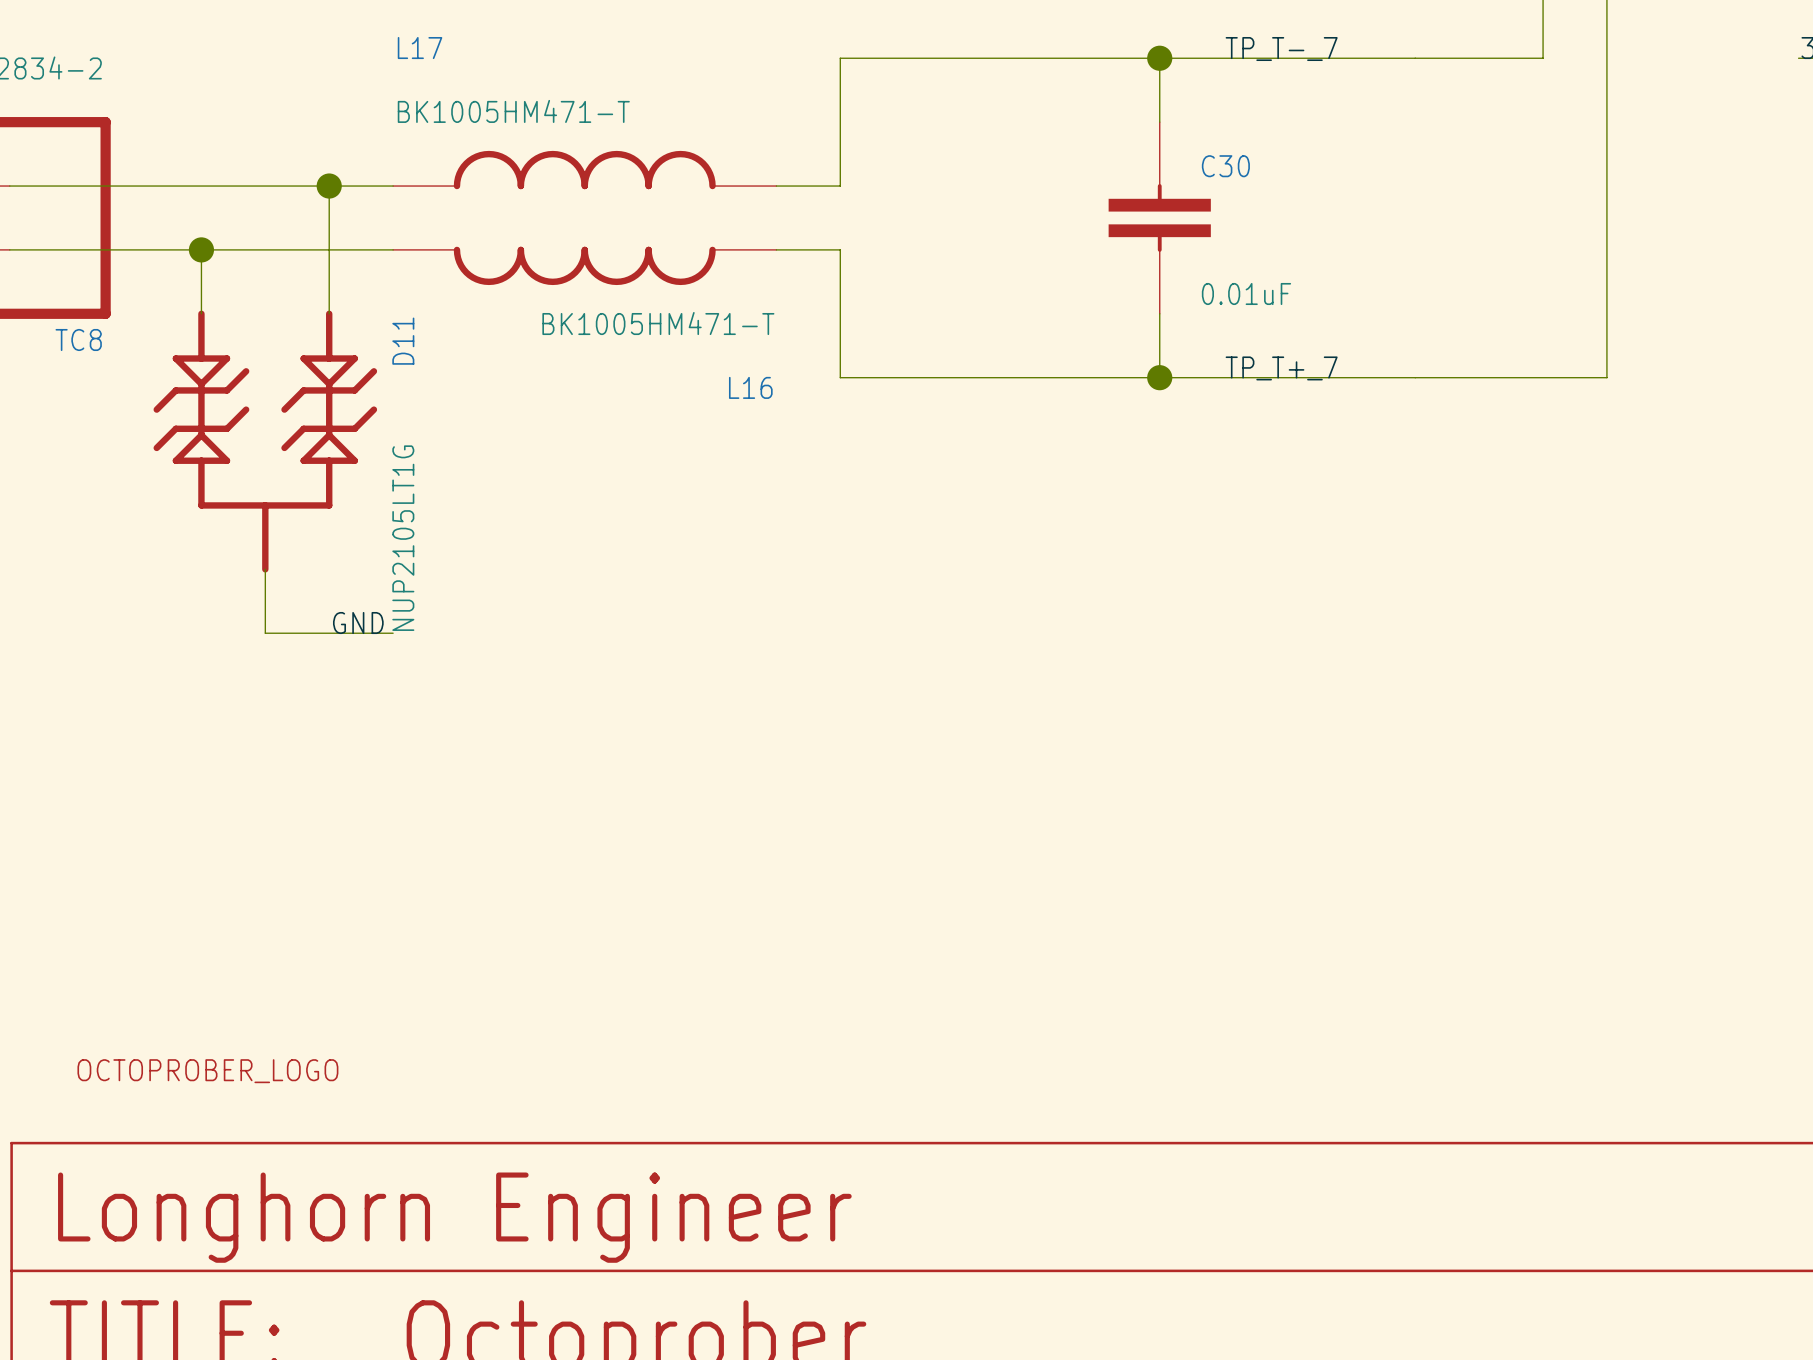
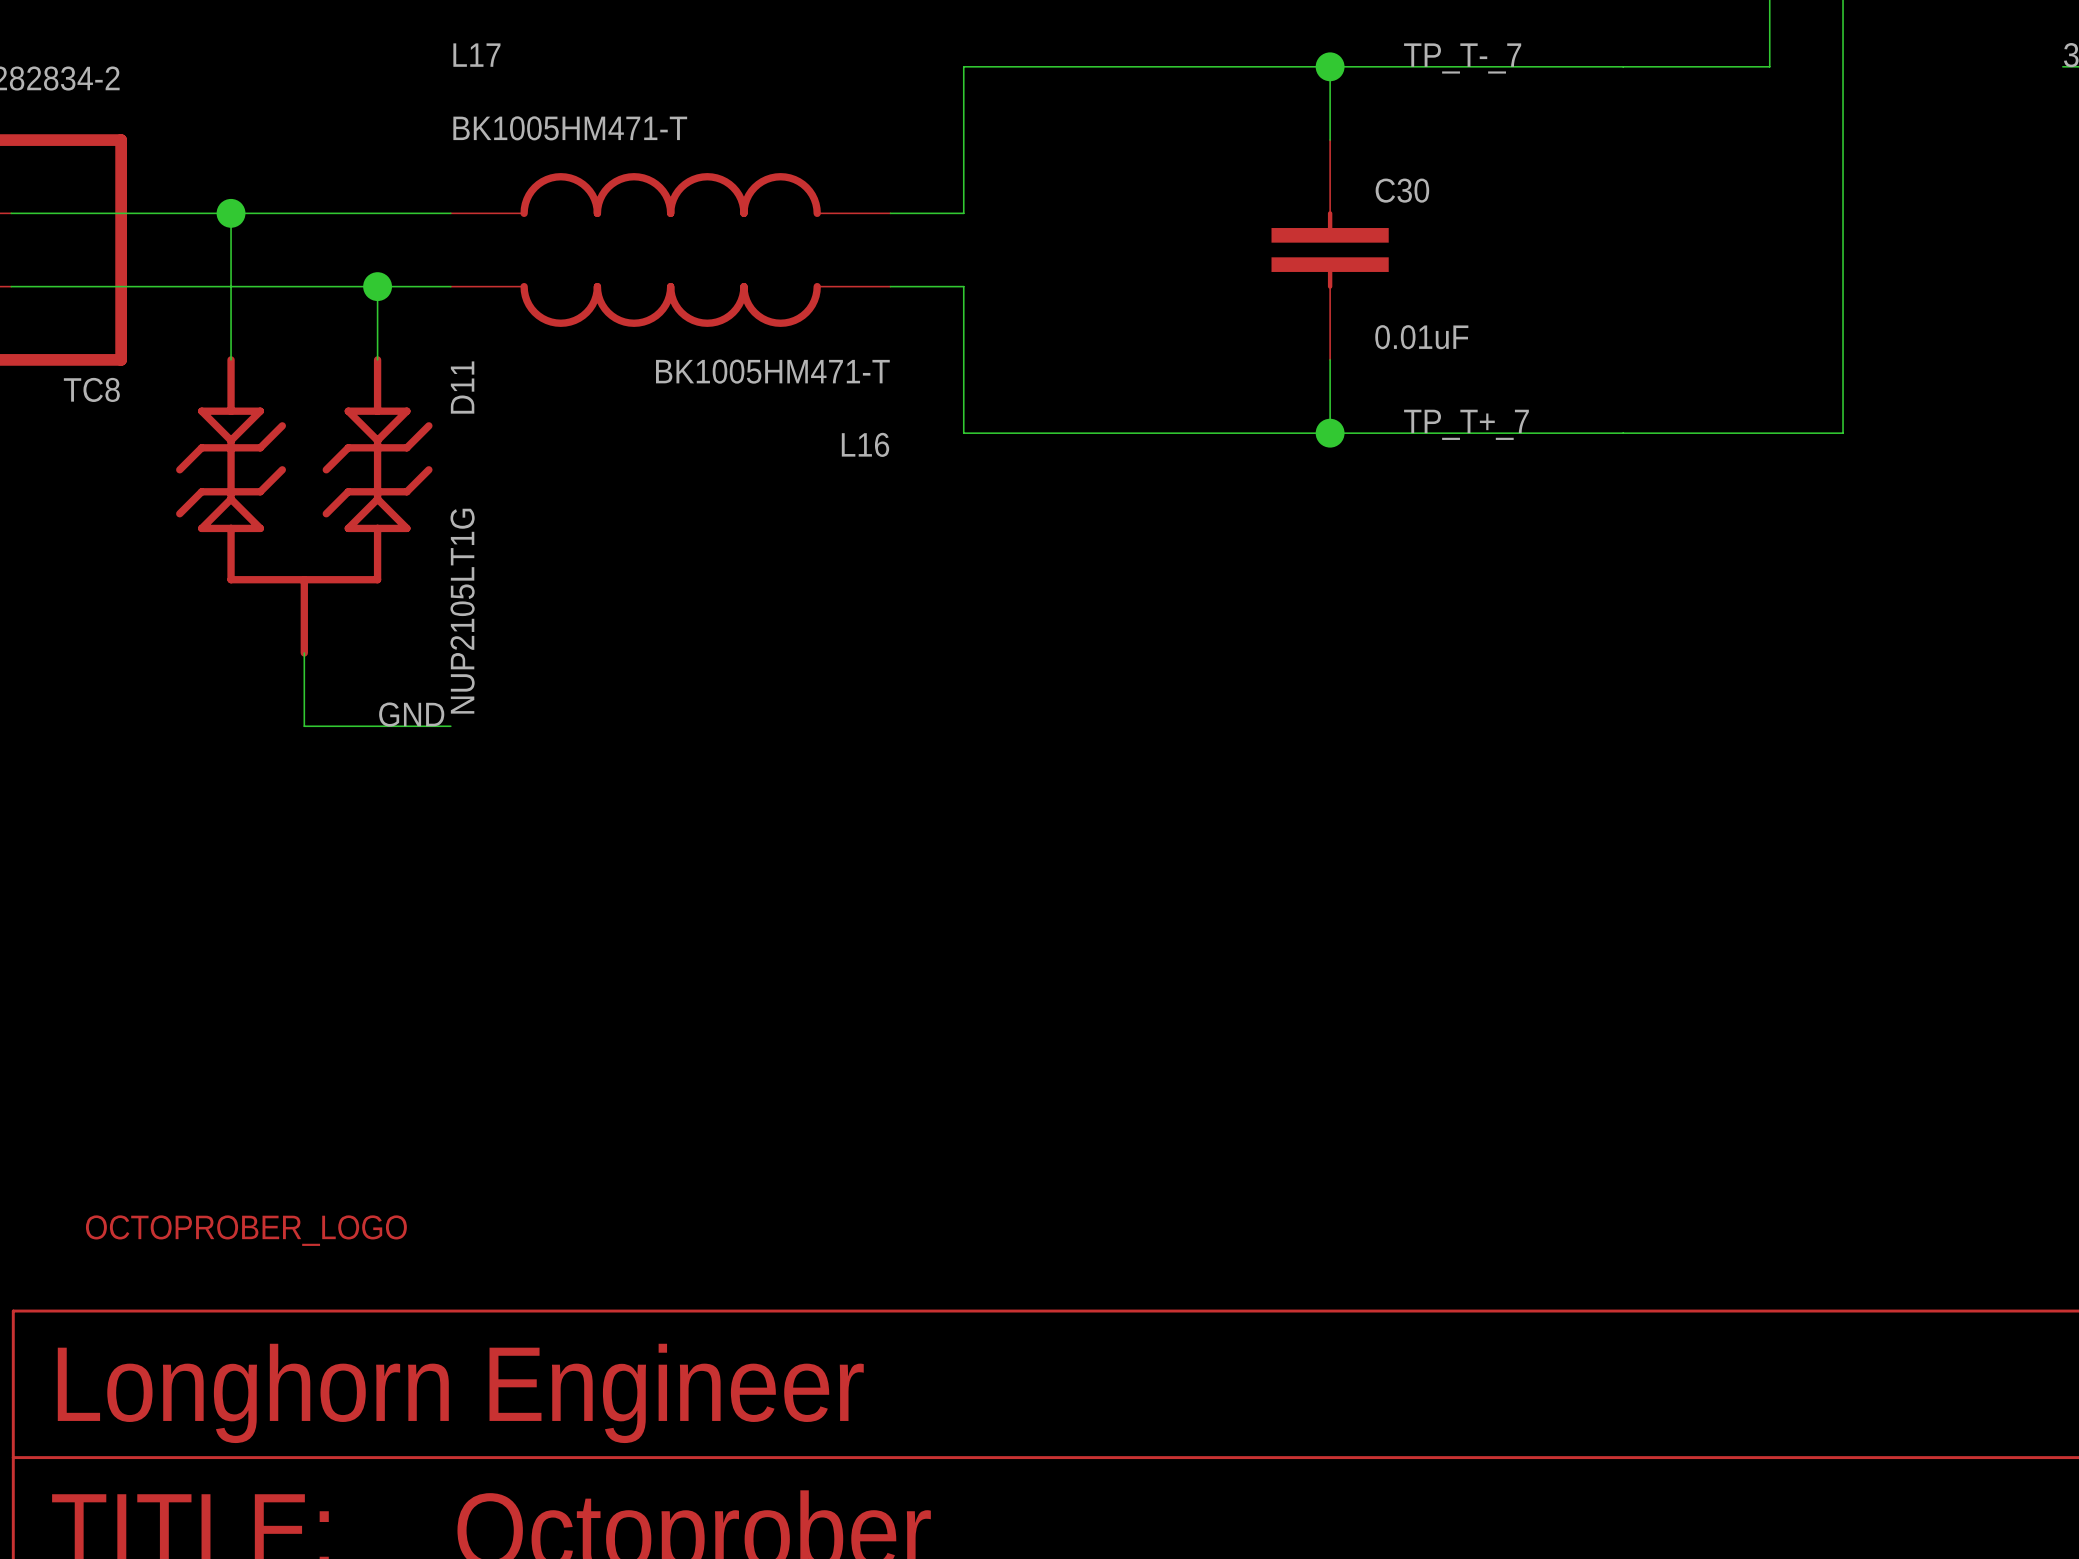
junction: none -> (231, 213)
wire: (329, 186) (329, 249) -> (231, 213) (231, 286)
junction: (329, 186) -> none
junction: (201, 249) -> none
junction: none -> (377, 286)

